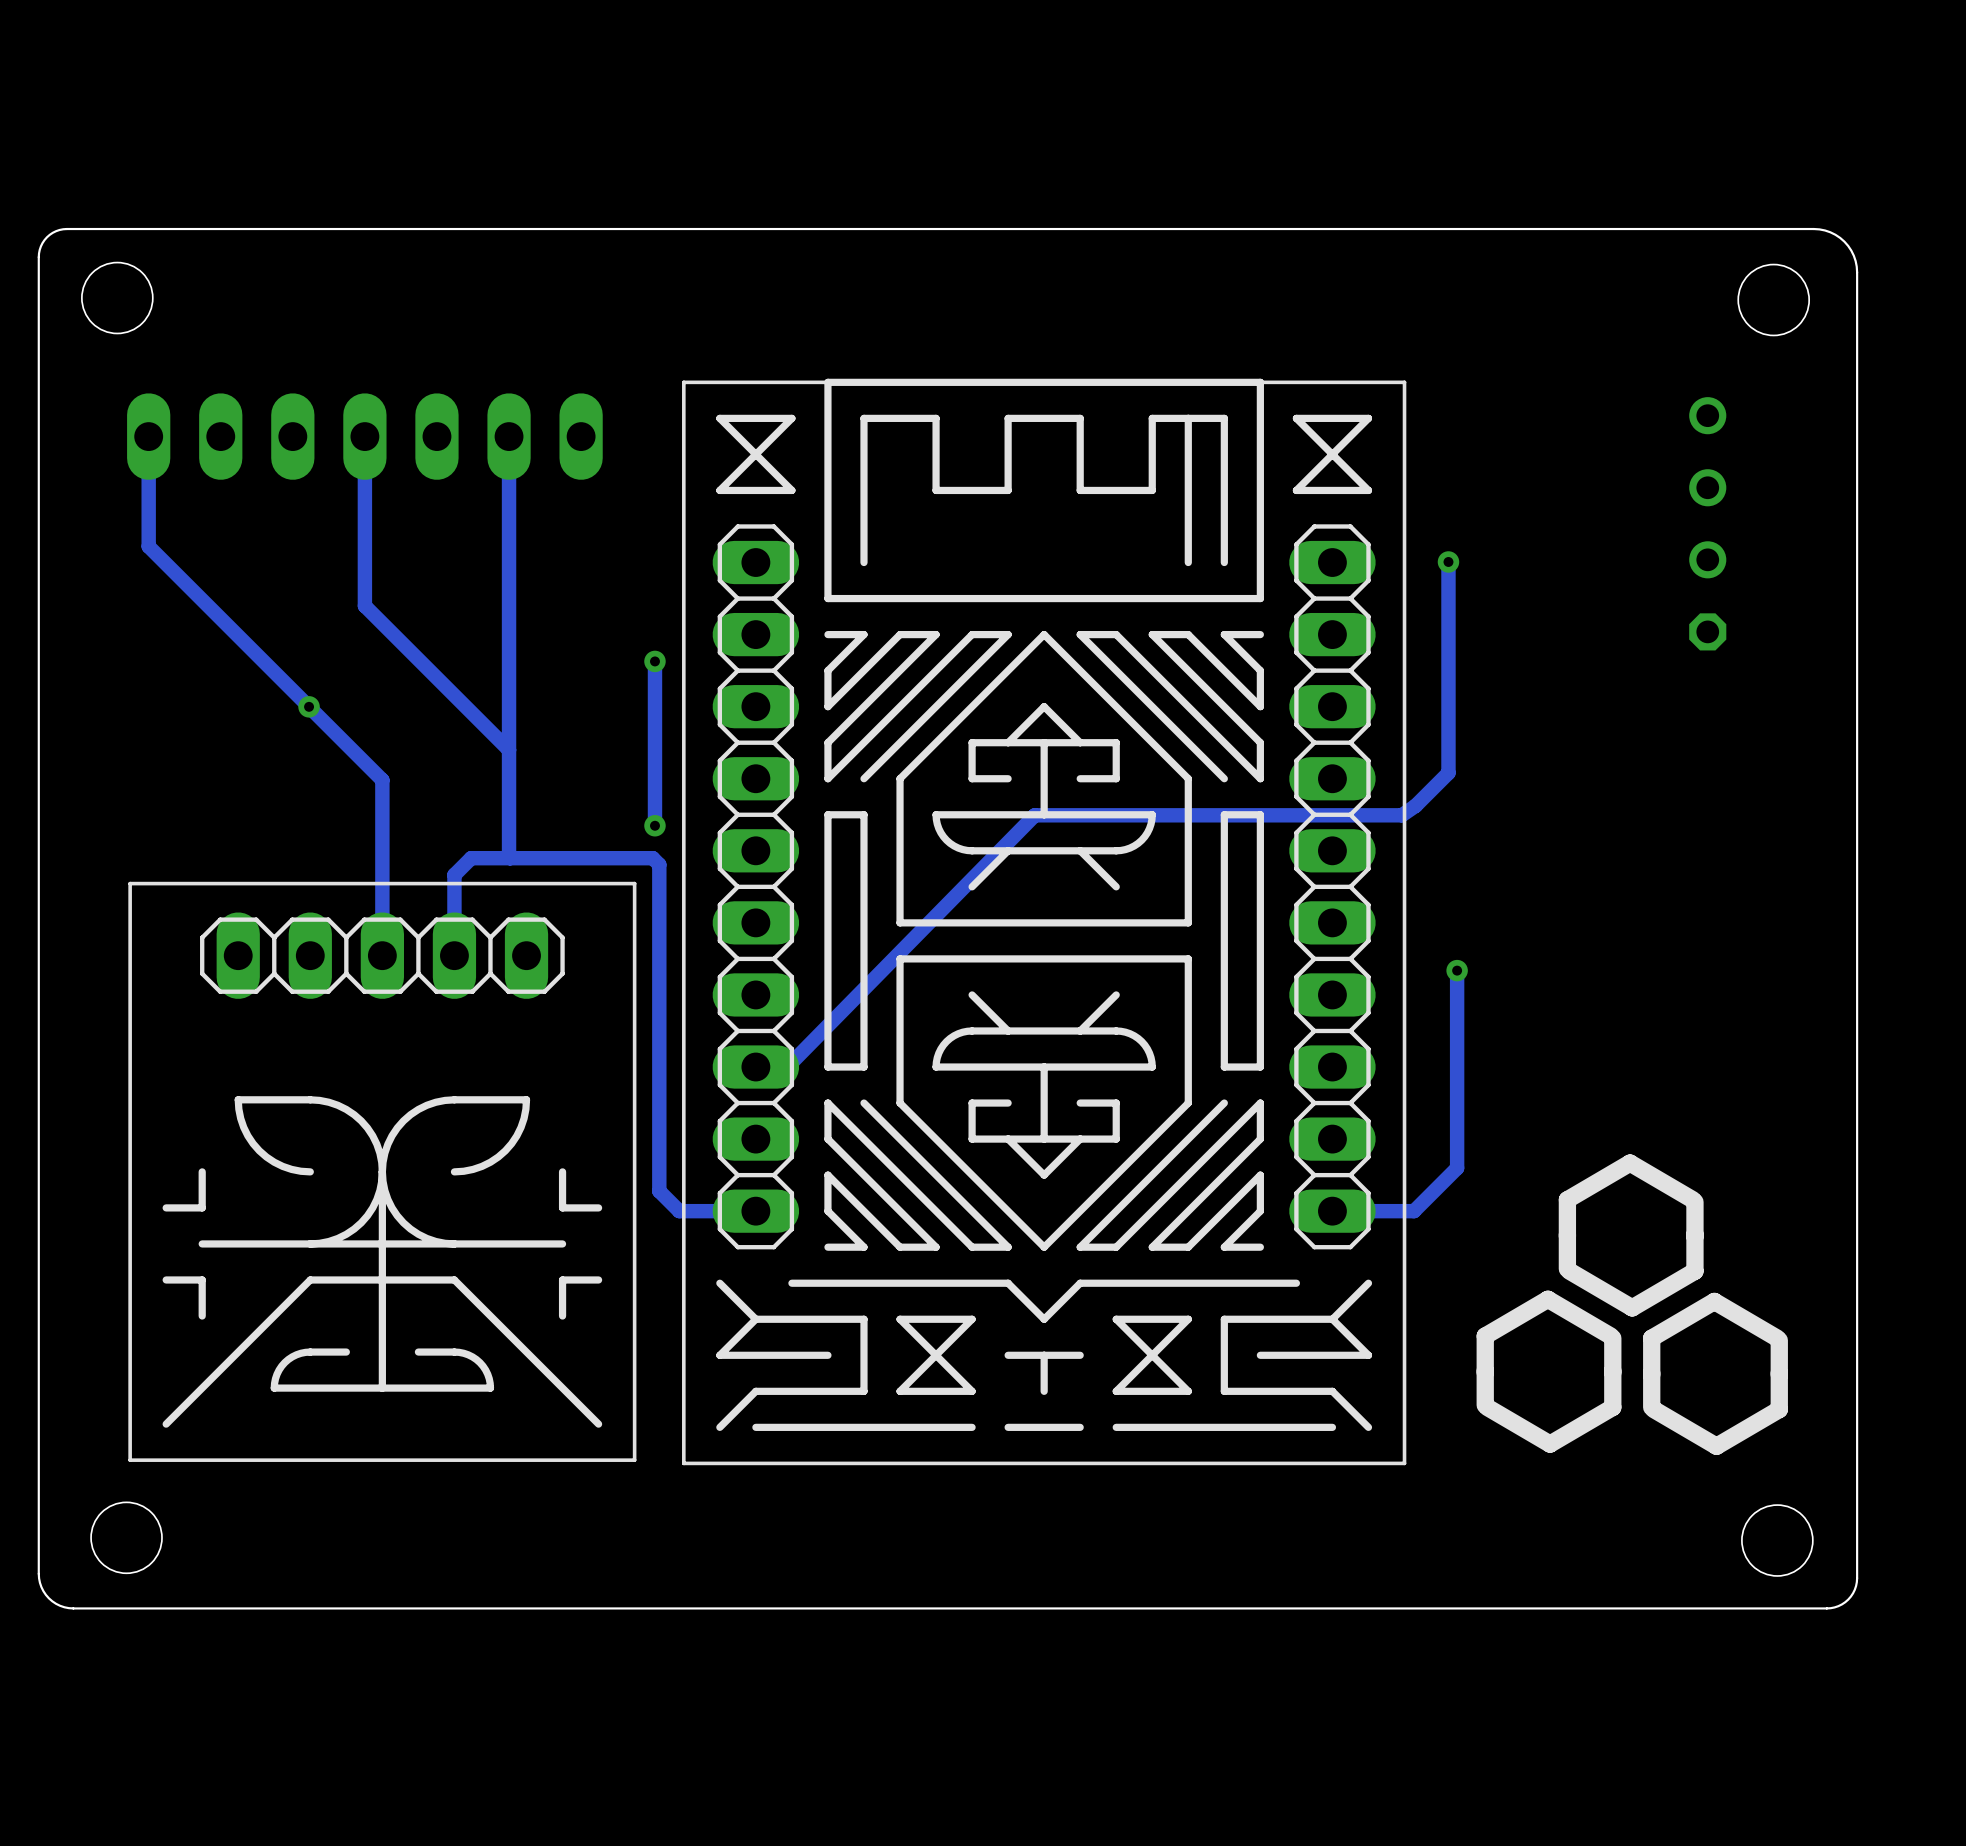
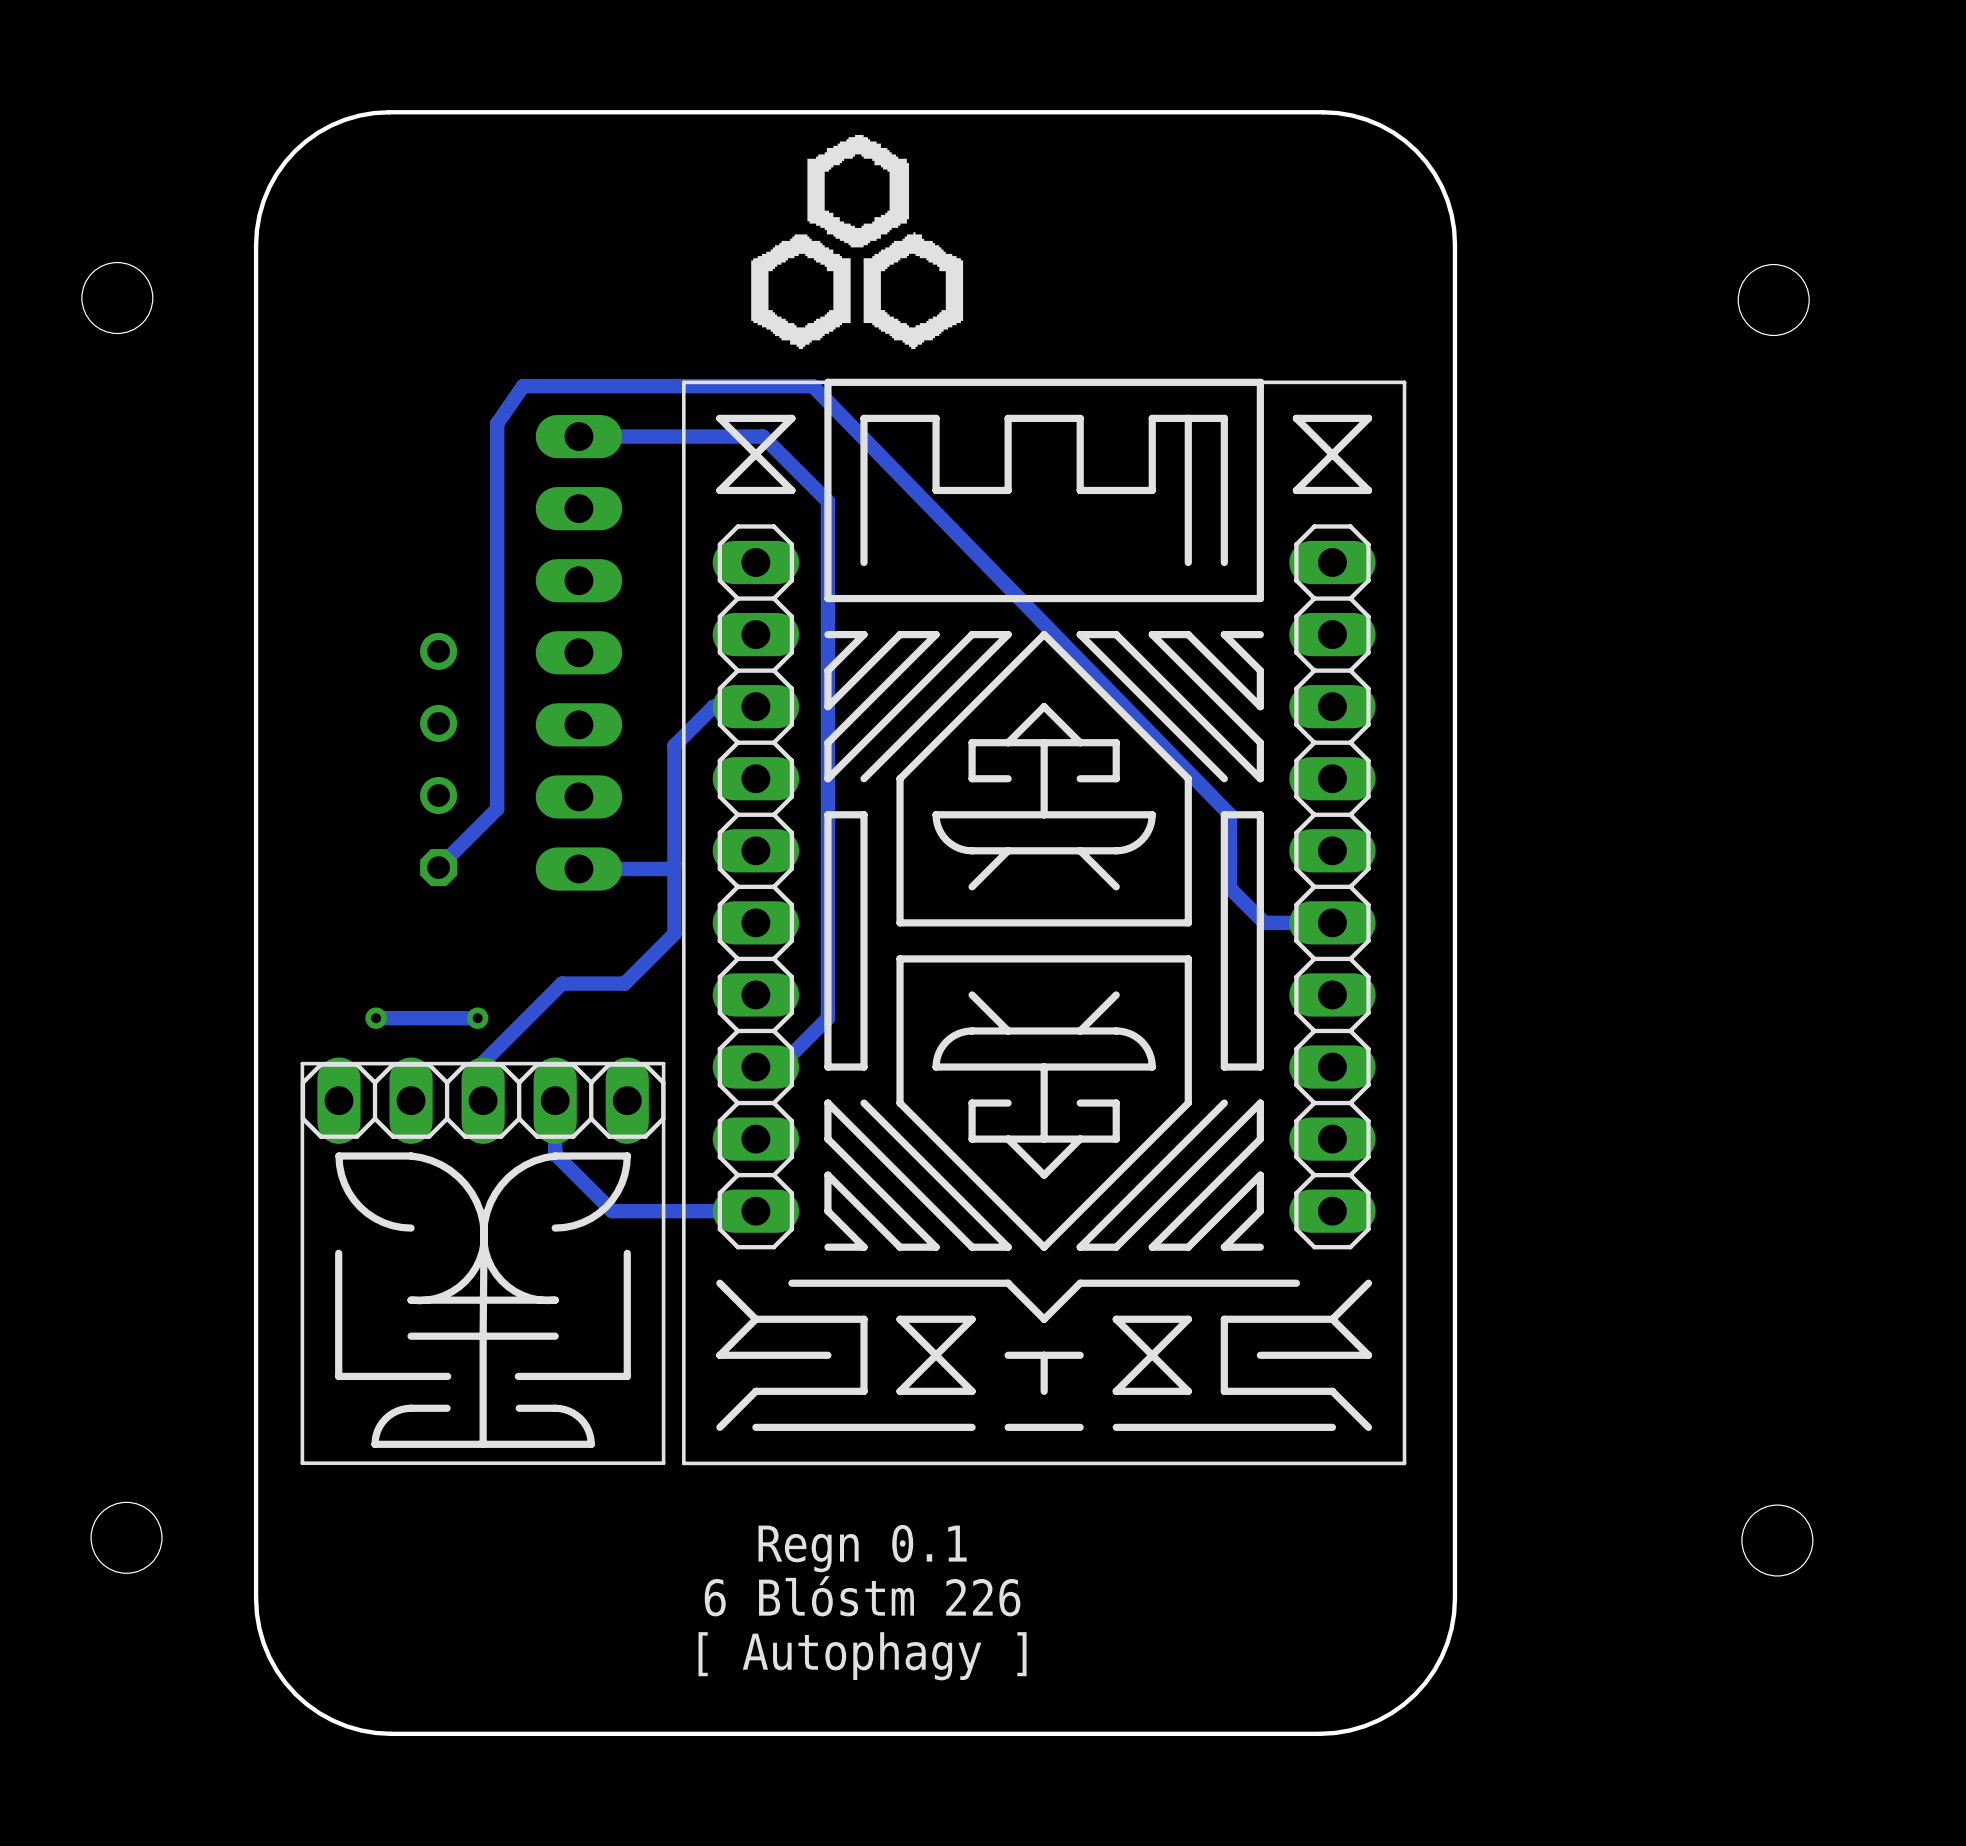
drawing: none -> [751, 134, 964, 350]
board edge: (1813, 229) (66, 229) (49, 234) (42, 243) (38, 257) (38, 1573) (39, 1582) (45, 1594) (56, 1603) (73, 1608) (1826, 1608) (1838, 1606) (1845, 1602) (1853, 1593) (1857, 1578) (1857, 272) (1853, 255) (1844, 241) (1830, 232) (1813, 229) -> (1323, 112) (1352, 115) (1366, 119) (1393, 132) (1416, 150) (1426, 161) (1441, 186) (1447, 200) (1454, 229) (1454, 1598) (1451, 1628) (1441, 1657) (1434, 1670) (1425, 1682) (1404, 1704) (1378, 1720) (1349, 1730) (1319, 1733) (391, 1733) (361, 1730) (332, 1720) (319, 1713) (306, 1704) (285, 1682) (269, 1657) (259, 1628) (256, 1598) (256, 245) (259, 215) (263, 201) (276, 174) (295, 151) (318, 132) (345, 119) (374, 113) (1323, 112)
track: (148, 436) (148, 546) (382, 780) (382, 955) -> none
track: (364, 436) (364, 605) (509, 750) -> none
part rotation: 0° (364, 436) -> 90° clockwise (578, 652)
part position: (364, 436) -> (578, 652)
track: (509, 436) (510, 858) -> none
part: (1707, 523) -> none
track: (1448, 561) (1448, 772) (1415, 805) (1401, 815) (1034, 815) (787, 1067) (779, 1067) -> (578, 436) (763, 436) (827, 501) (827, 1018) (779, 1067)
via: (1448, 561) -> none
track: (654, 661) (654, 825) -> none
via: (654, 661) -> none
via: (309, 706) -> none
track: none -> (755, 706) (713, 706) (674, 745) (674, 933) (624, 983) (562, 983) (483, 1062) (483, 1100)
part: none -> (438, 759)
via: (654, 825) -> none
track: none -> (674, 864) (670, 869) (578, 869)
track: none -> (438, 867) (497, 809) (497, 423) (523, 386) (812, 386) (1230, 814) (1230, 888) (1264, 922) (1332, 922)
track: (454, 955) (454, 874) (471, 858) (652, 858) (659, 864) (659, 1191) (679, 1211) -> (555, 1100) (555, 1154) (612, 1211) (679, 1211)
track: (1457, 970) (1457, 1168) (1414, 1211) (1332, 1211) -> none
via: (1457, 970) -> none
via: none -> (376, 1018)
track: none -> (477, 1018) (376, 1018)
via: none -> (477, 1018)
part: (382, 1171) -> none
line: (1692, 1199) (1630, 1163) (1567, 1199) (1567, 1268) -> none
line: (1694, 1201) (1694, 1271) (1632, 1307) (1569, 1271) -> none
part: none -> (483, 1261)
line: (1610, 1336) (1547, 1299) (1485, 1336) (1485, 1405) -> none
line: (1612, 1338) (1612, 1407) (1550, 1444) (1487, 1407) -> none
line: (1777, 1338) (1714, 1301) (1651, 1338) (1651, 1407) -> none
line: (1779, 1340) (1779, 1409) (1716, 1446) (1653, 1409) -> none
text: none -> Regn 0.1 (862, 1548)
text: none -> 6 Blóstm 226 (862, 1596)
text: none -> [ Autophagy ] (862, 1656)

